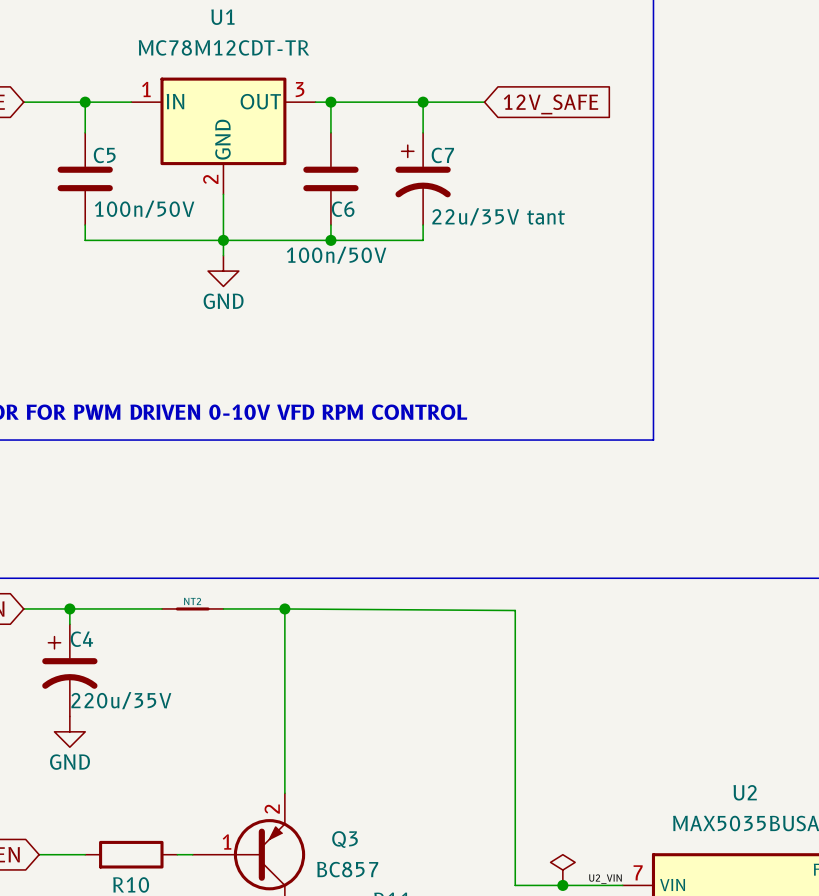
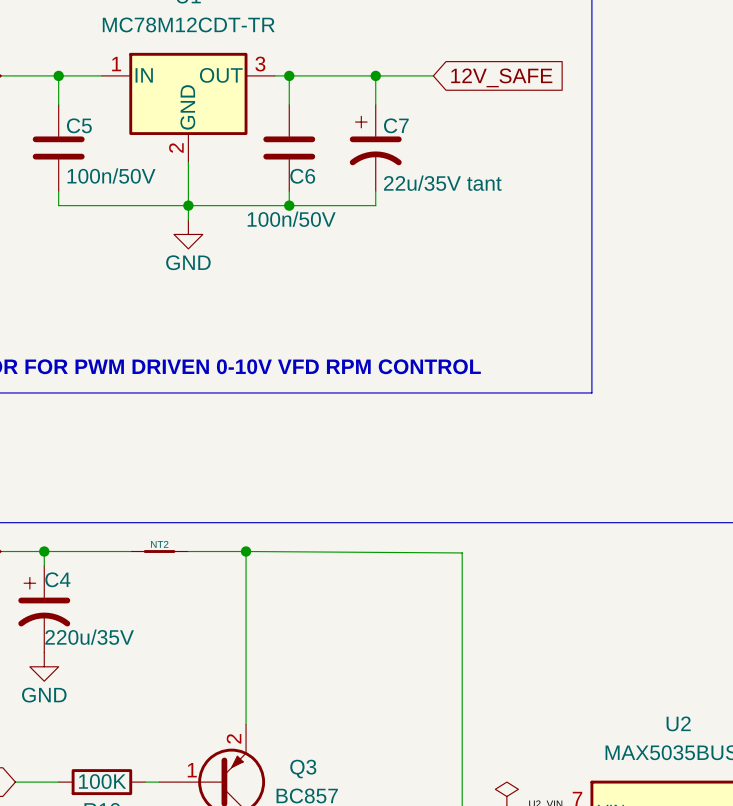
R10 value: none -> 100K (102, 781)

